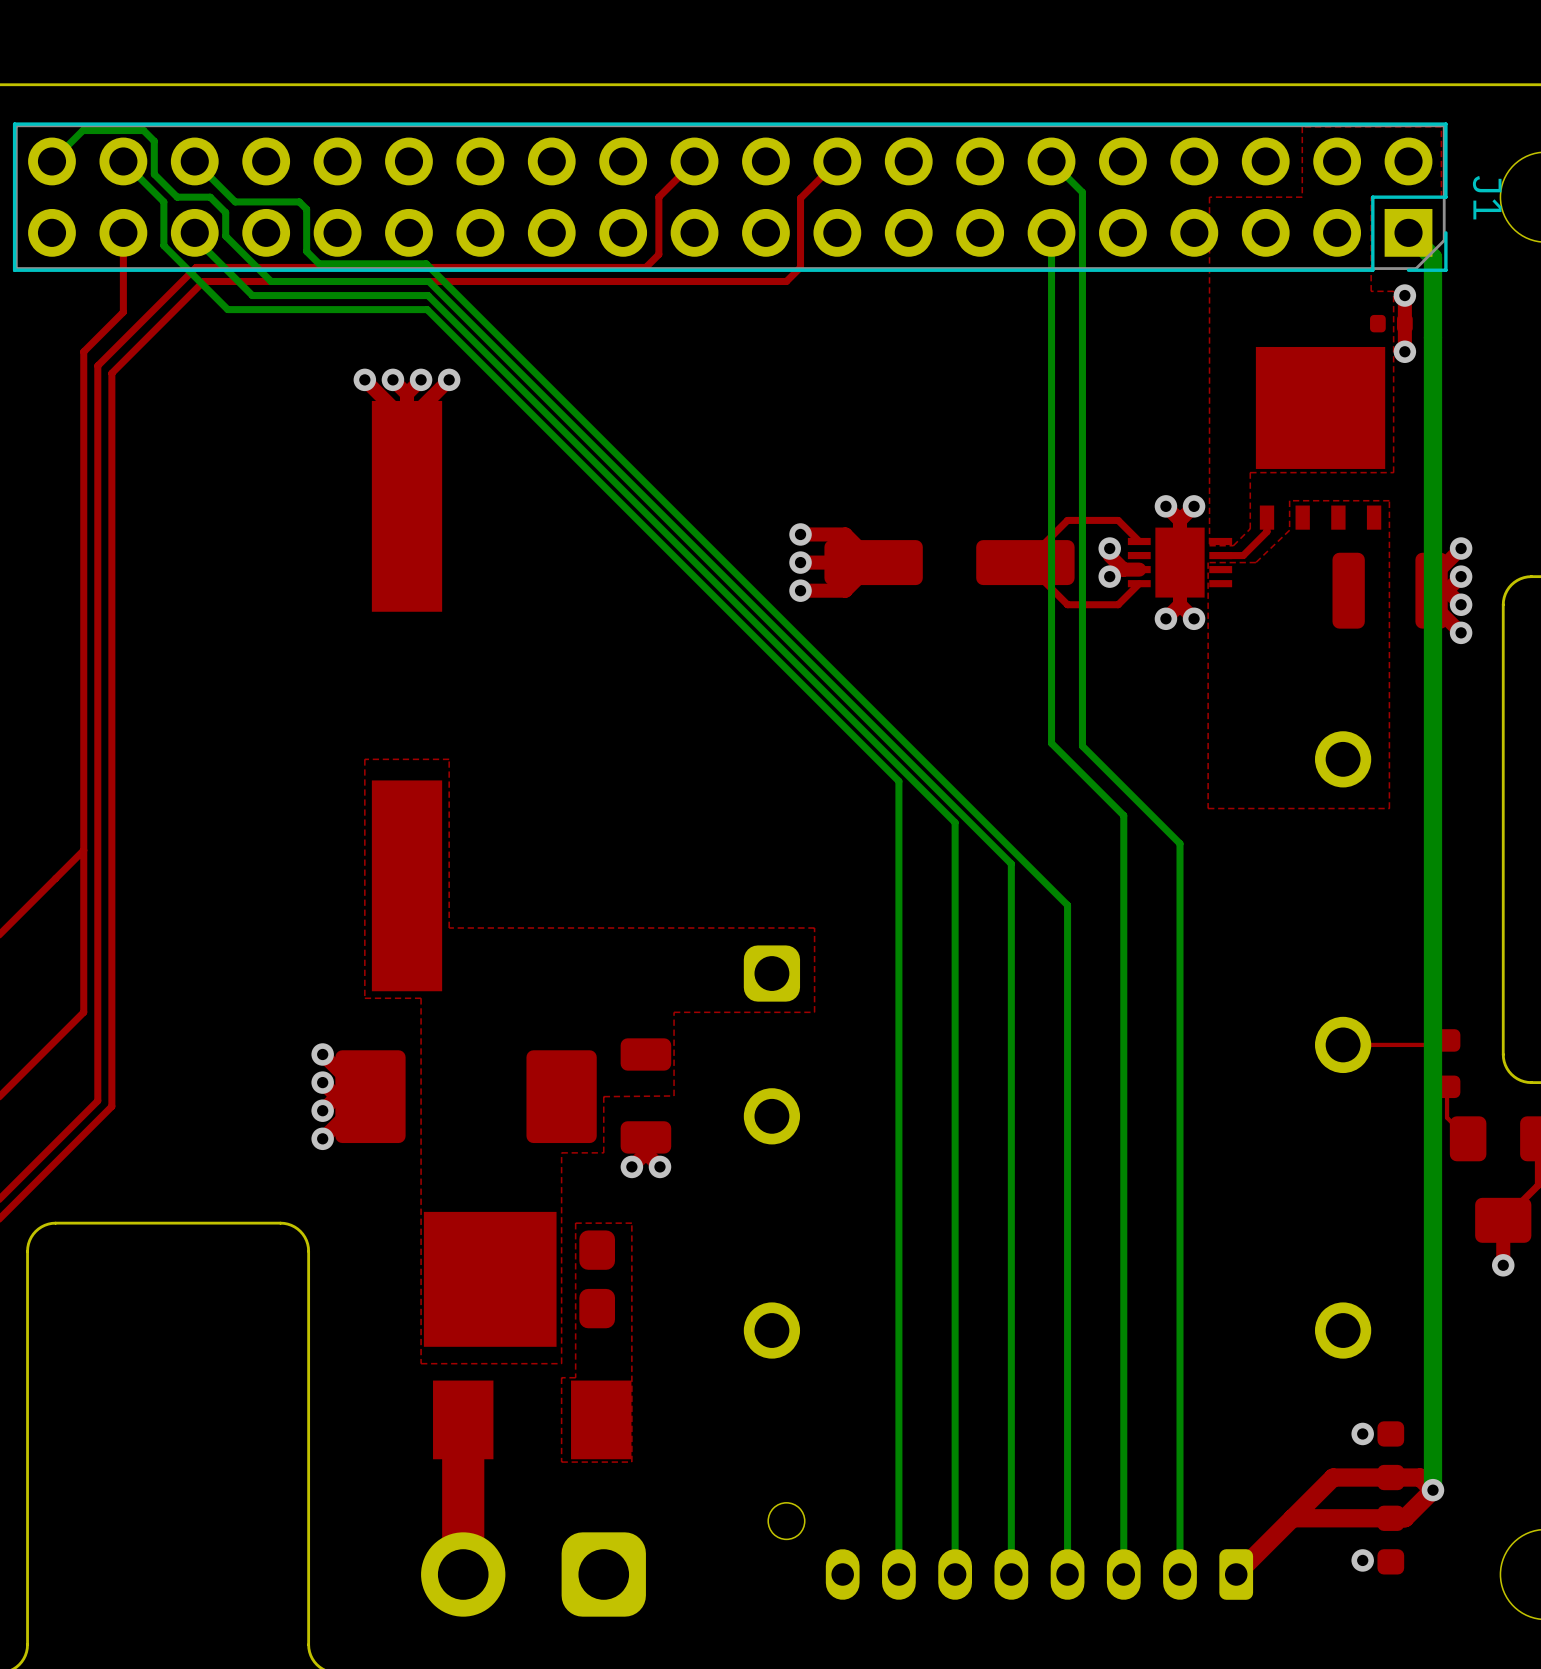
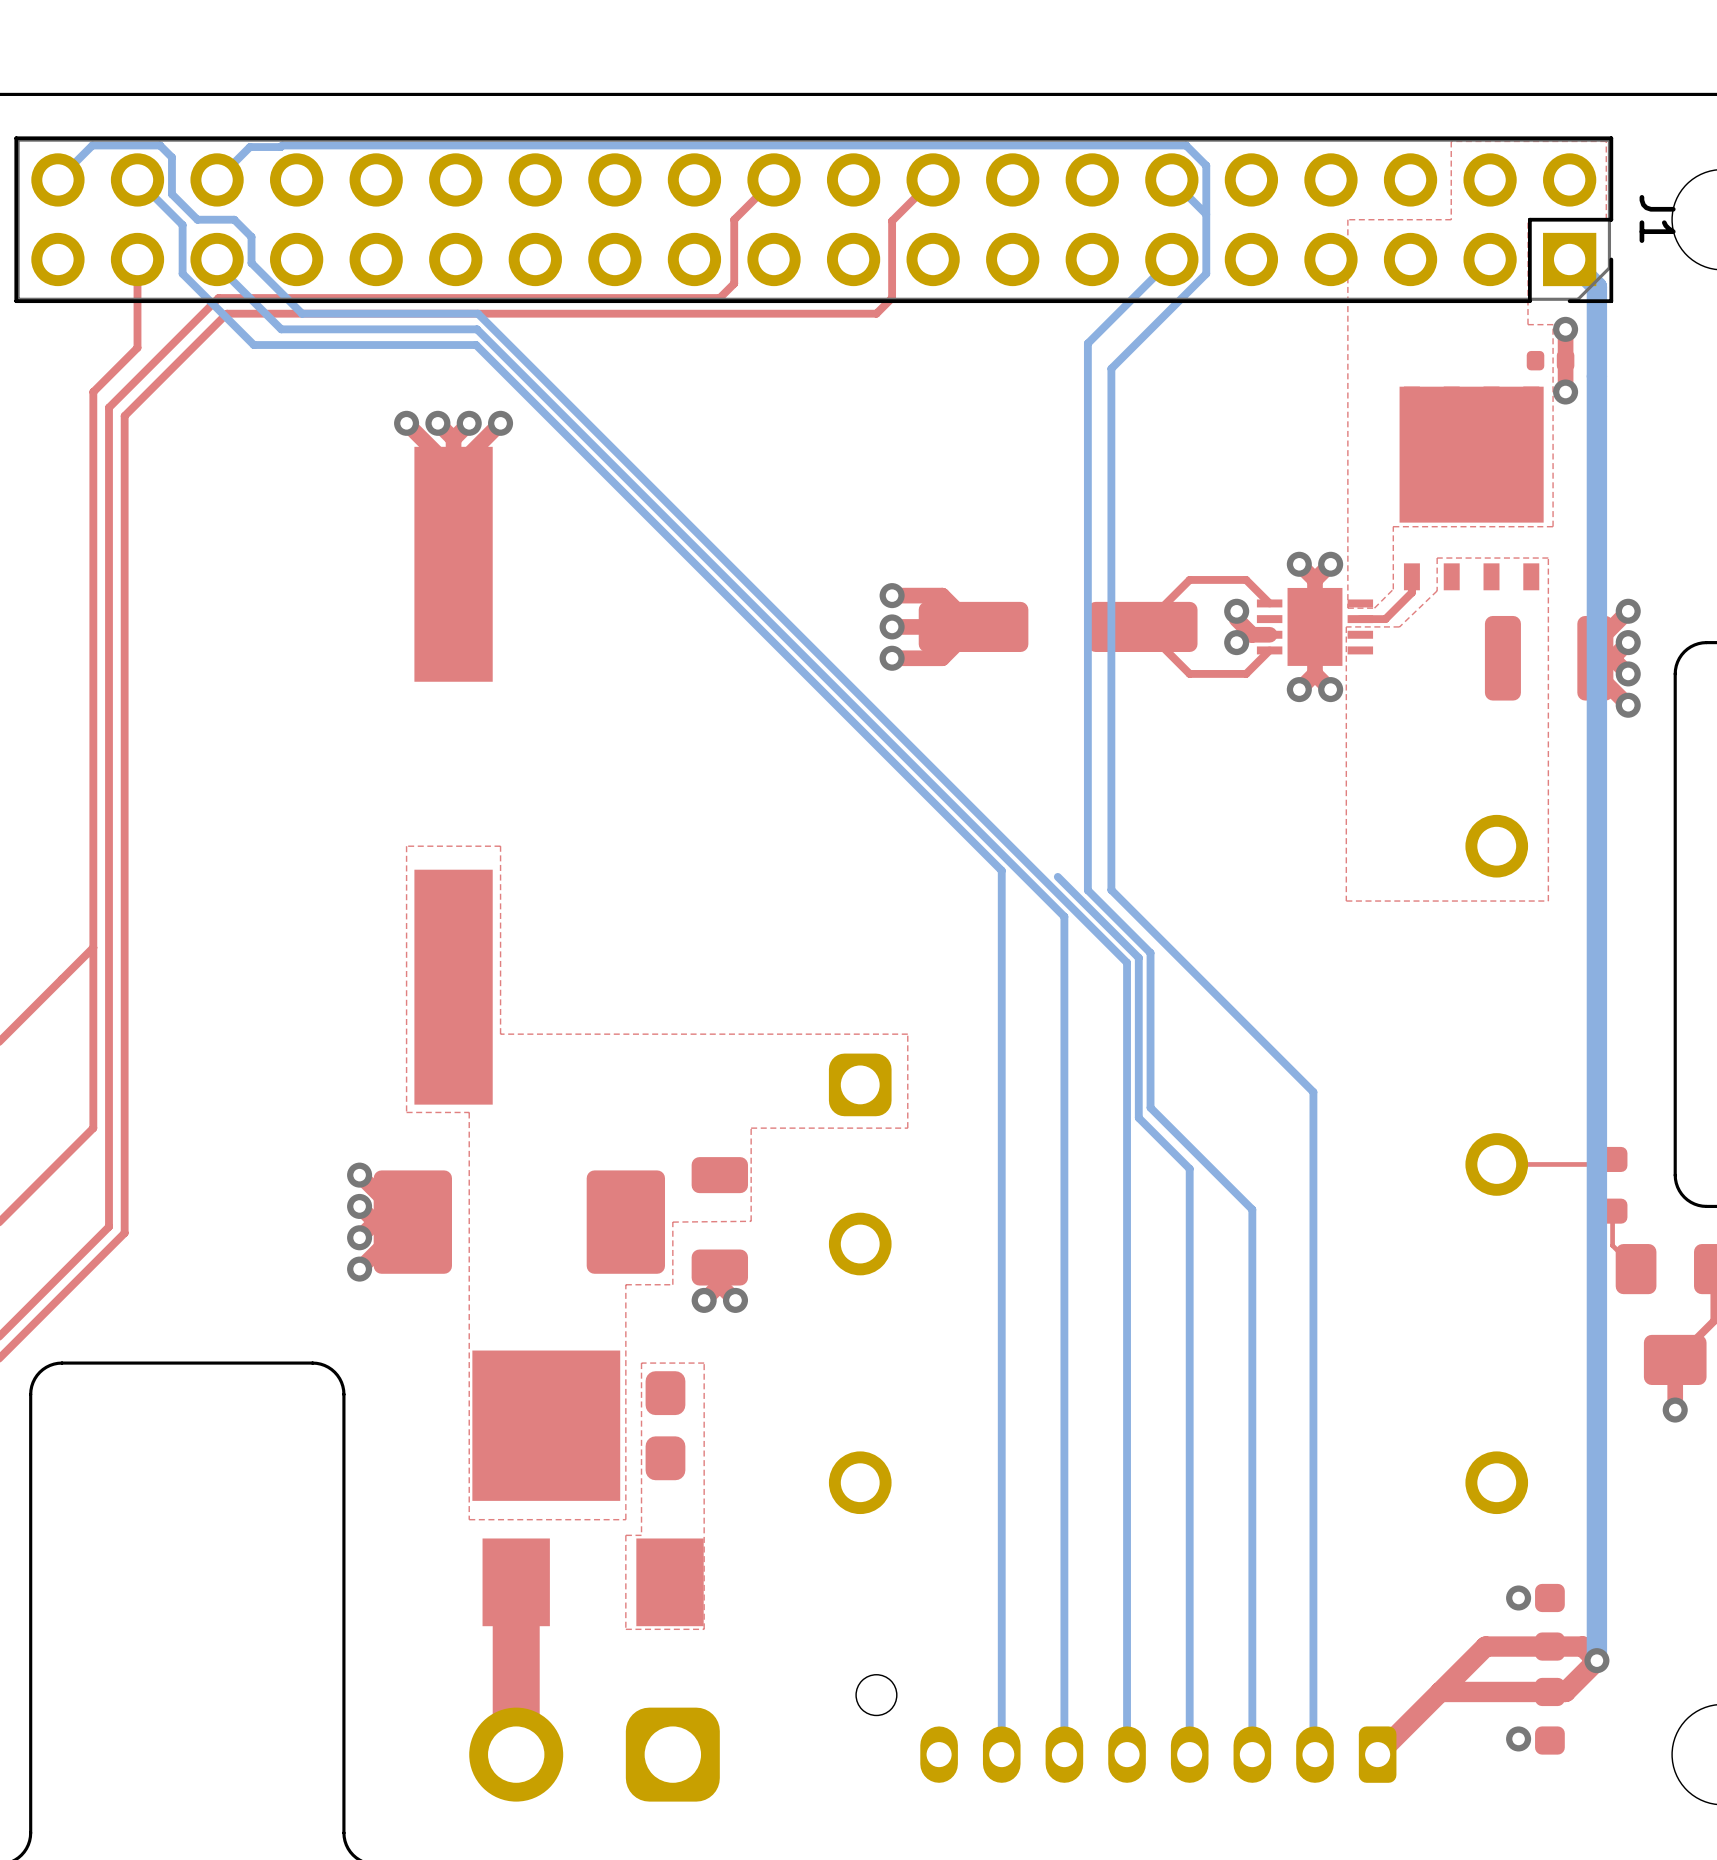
bottom track: (194, 161) (235, 201) (299, 201) (306, 209) (306, 251) (319, 263) (426, 263) (949, 786) -> (217, 179) (249, 147) (282, 145) (1186, 145) (1206, 165) (1206, 214)
bottom track: (1051, 232) (1051, 743) (1123, 815) (1123, 1085) -> (1171, 259) (1087, 343) (1087, 890) (1150, 952) (1150, 1107) (1252, 1209)
bottom track: (1082, 245) (1082, 746) (1180, 843) (1180, 1574) -> (1206, 273) (1111, 368) (1111, 890) (1313, 1092) (1313, 1753) (1314, 1754)
bottom track: (1021, 859) (1067, 905) (1067, 1048) -> (1138, 957) (1138, 1117) (1189, 1168)

